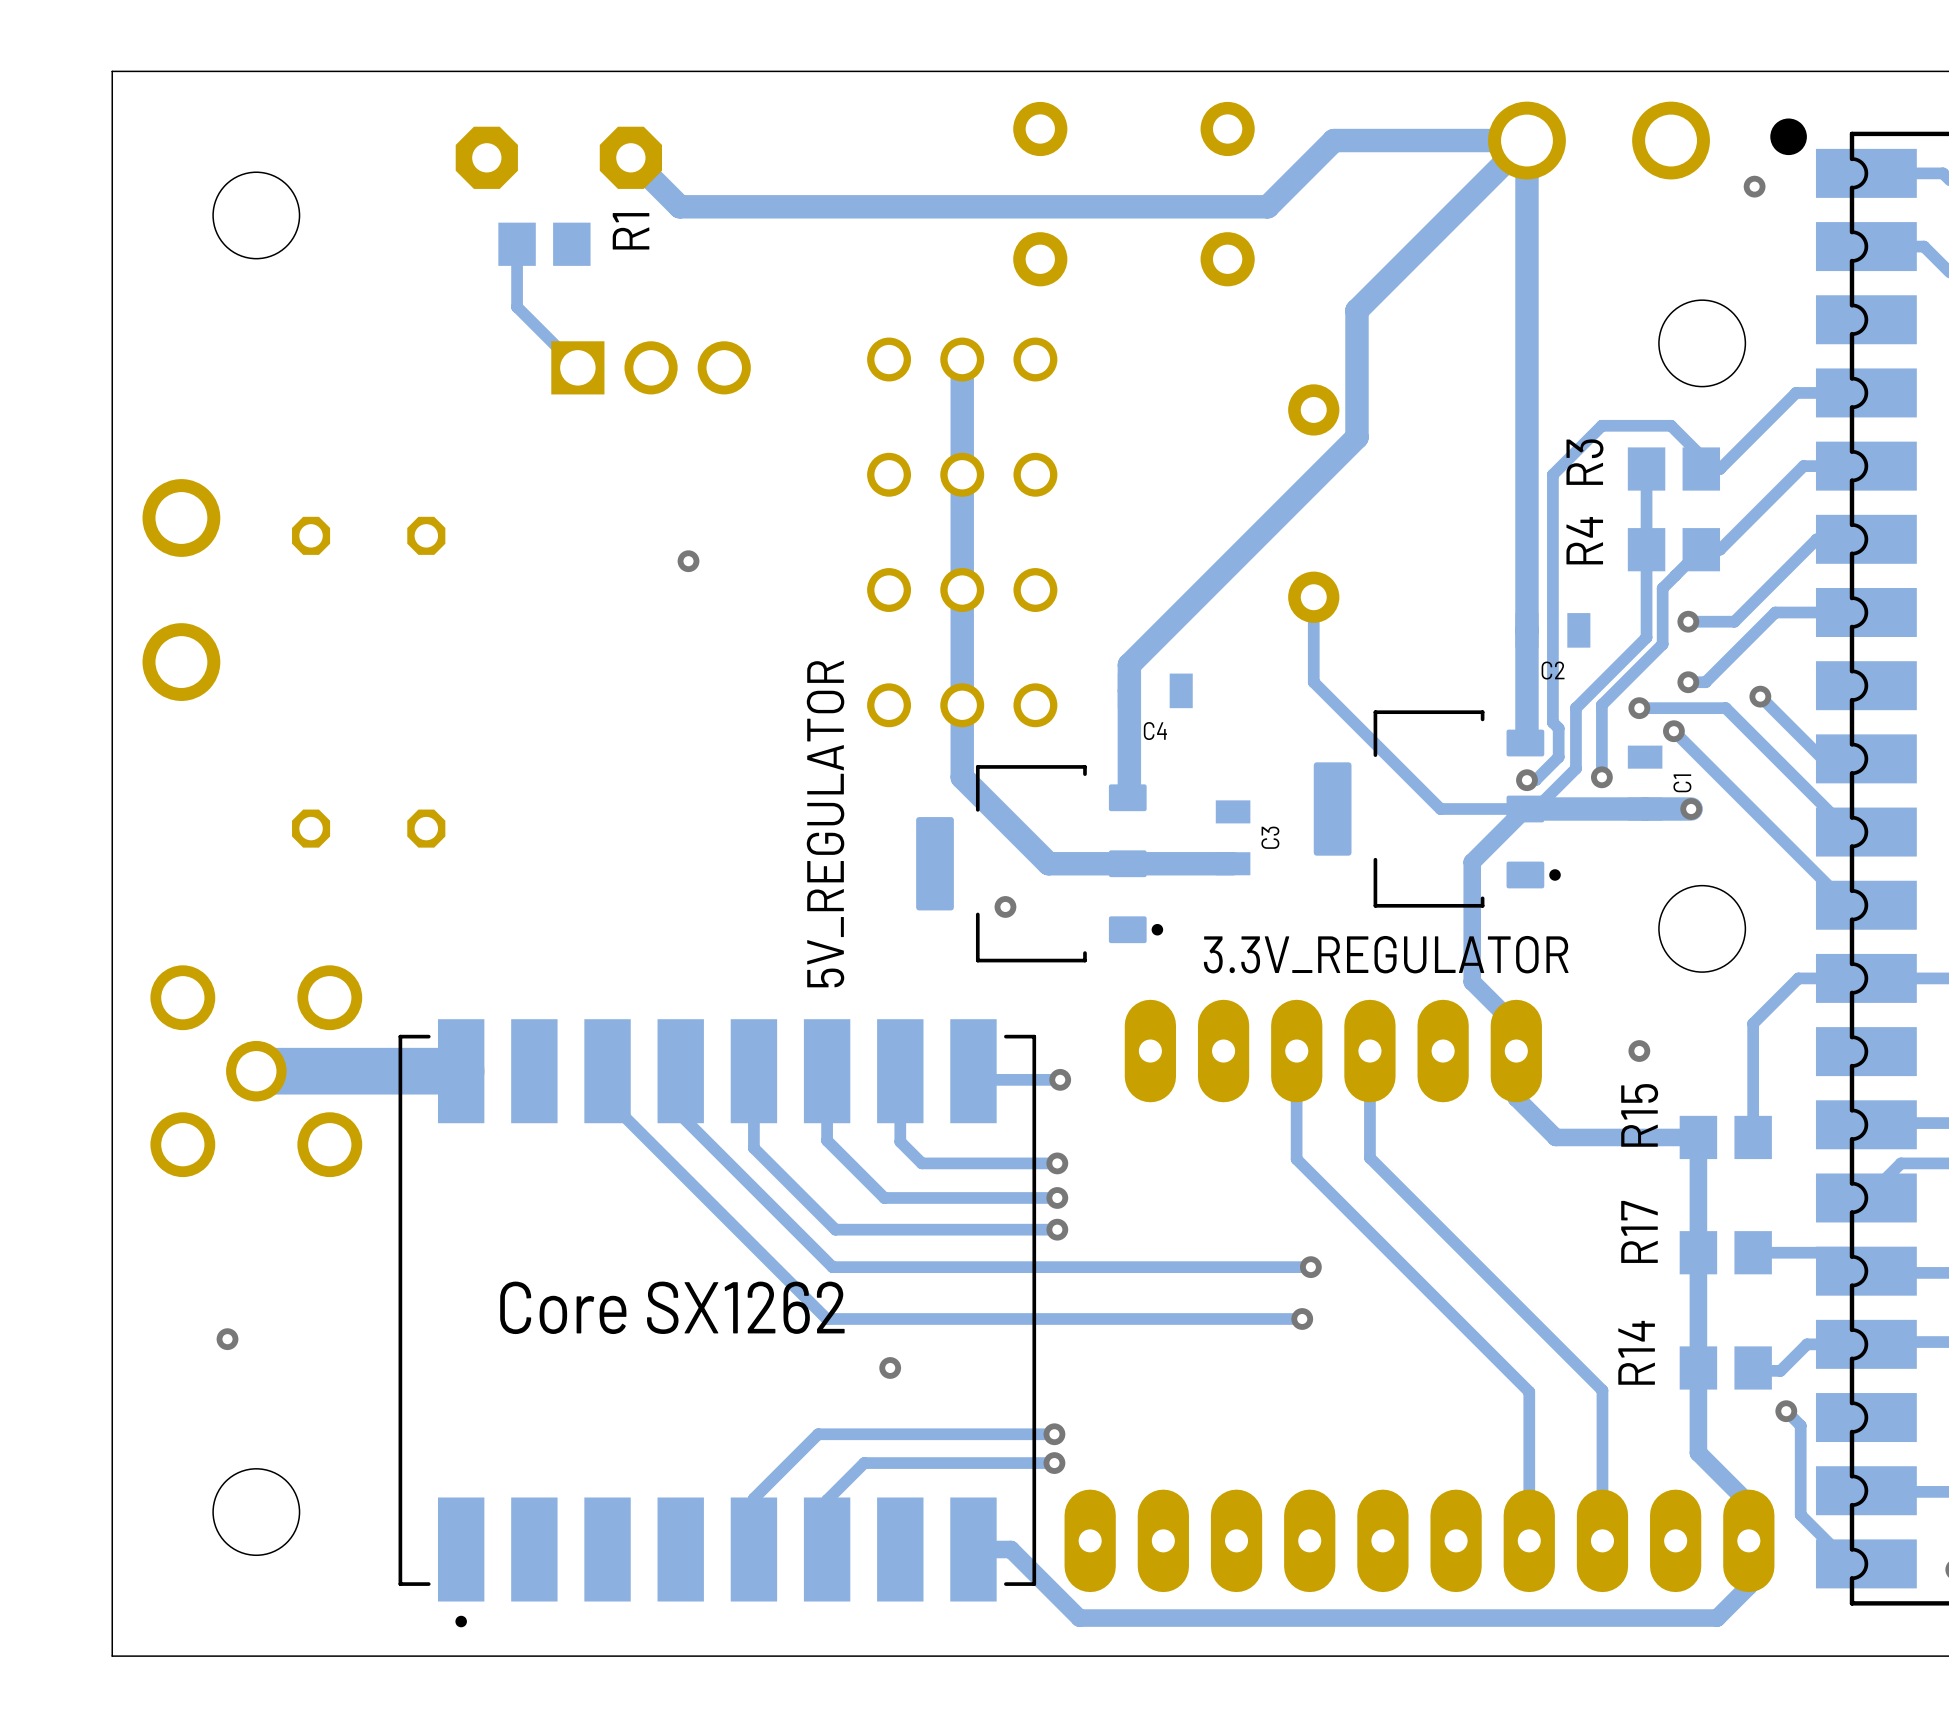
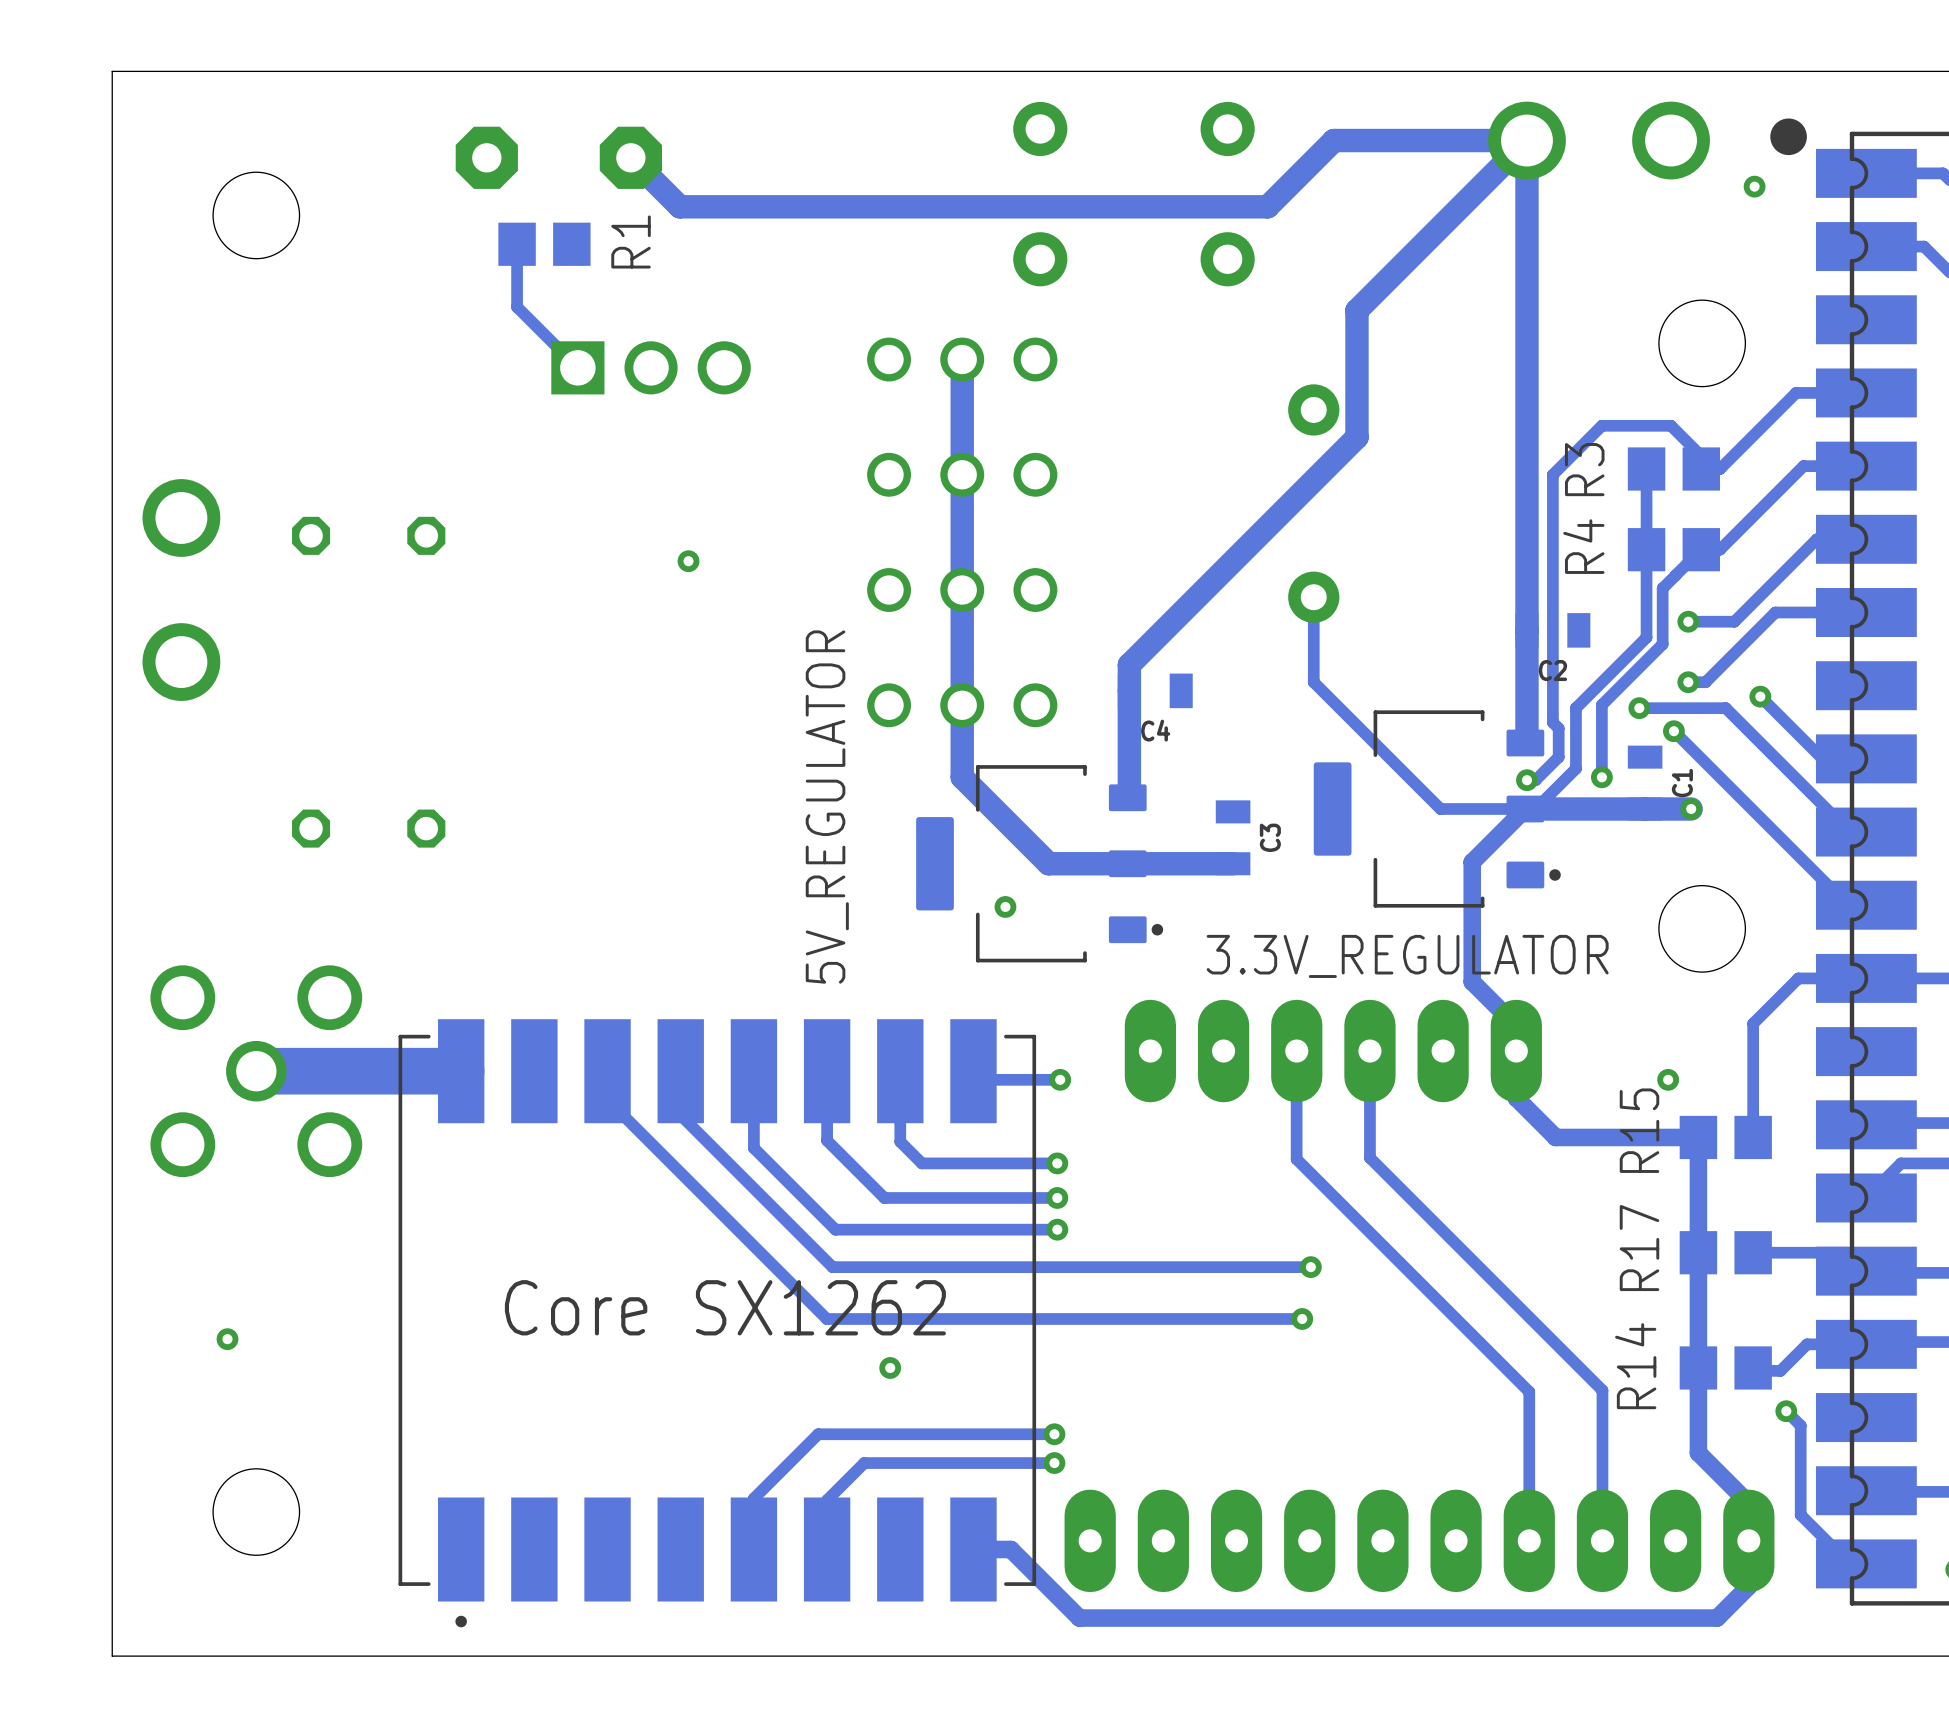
via position: (1639, 1051) -> (1668, 1079)

